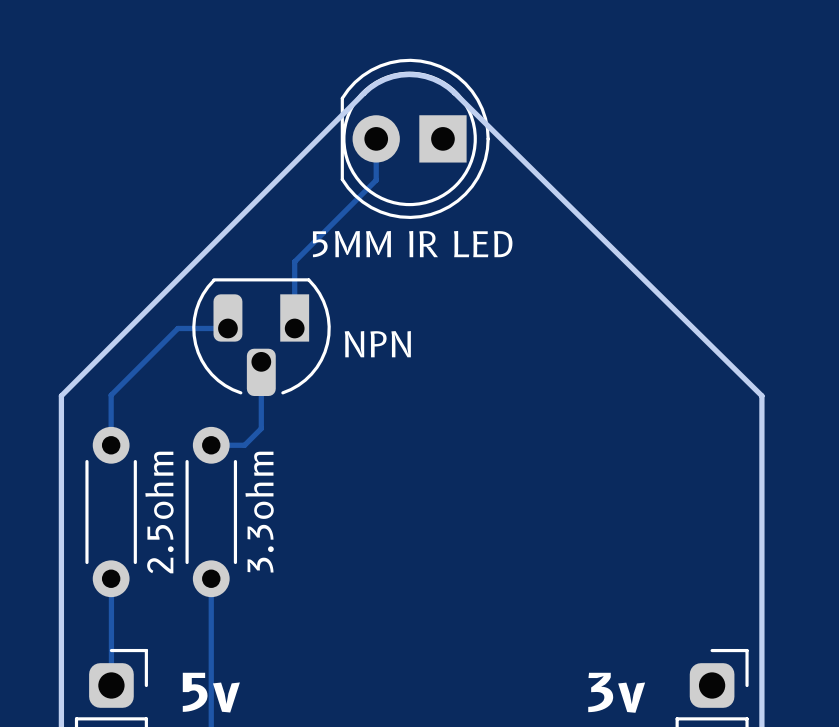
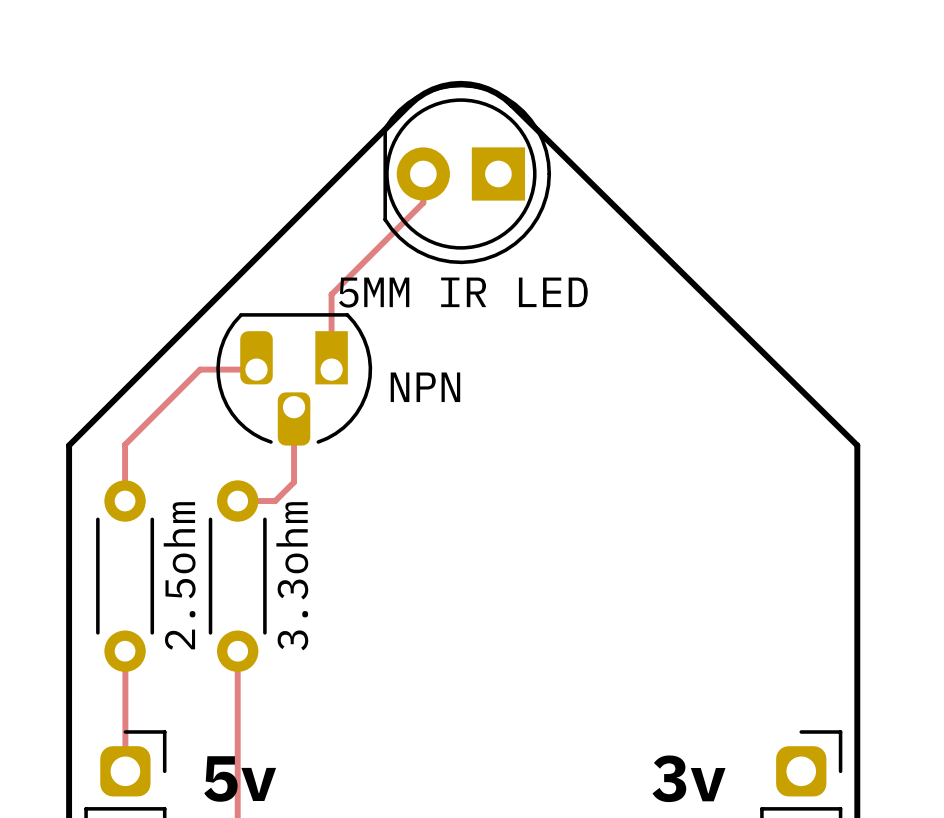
5MM IR LED footprint: [340, 58, 490, 220] -> [383, 83, 552, 265]
5MM IR LED name position: 5MM IR LED (412, 244) -> 5MM IR LED (463, 292)

